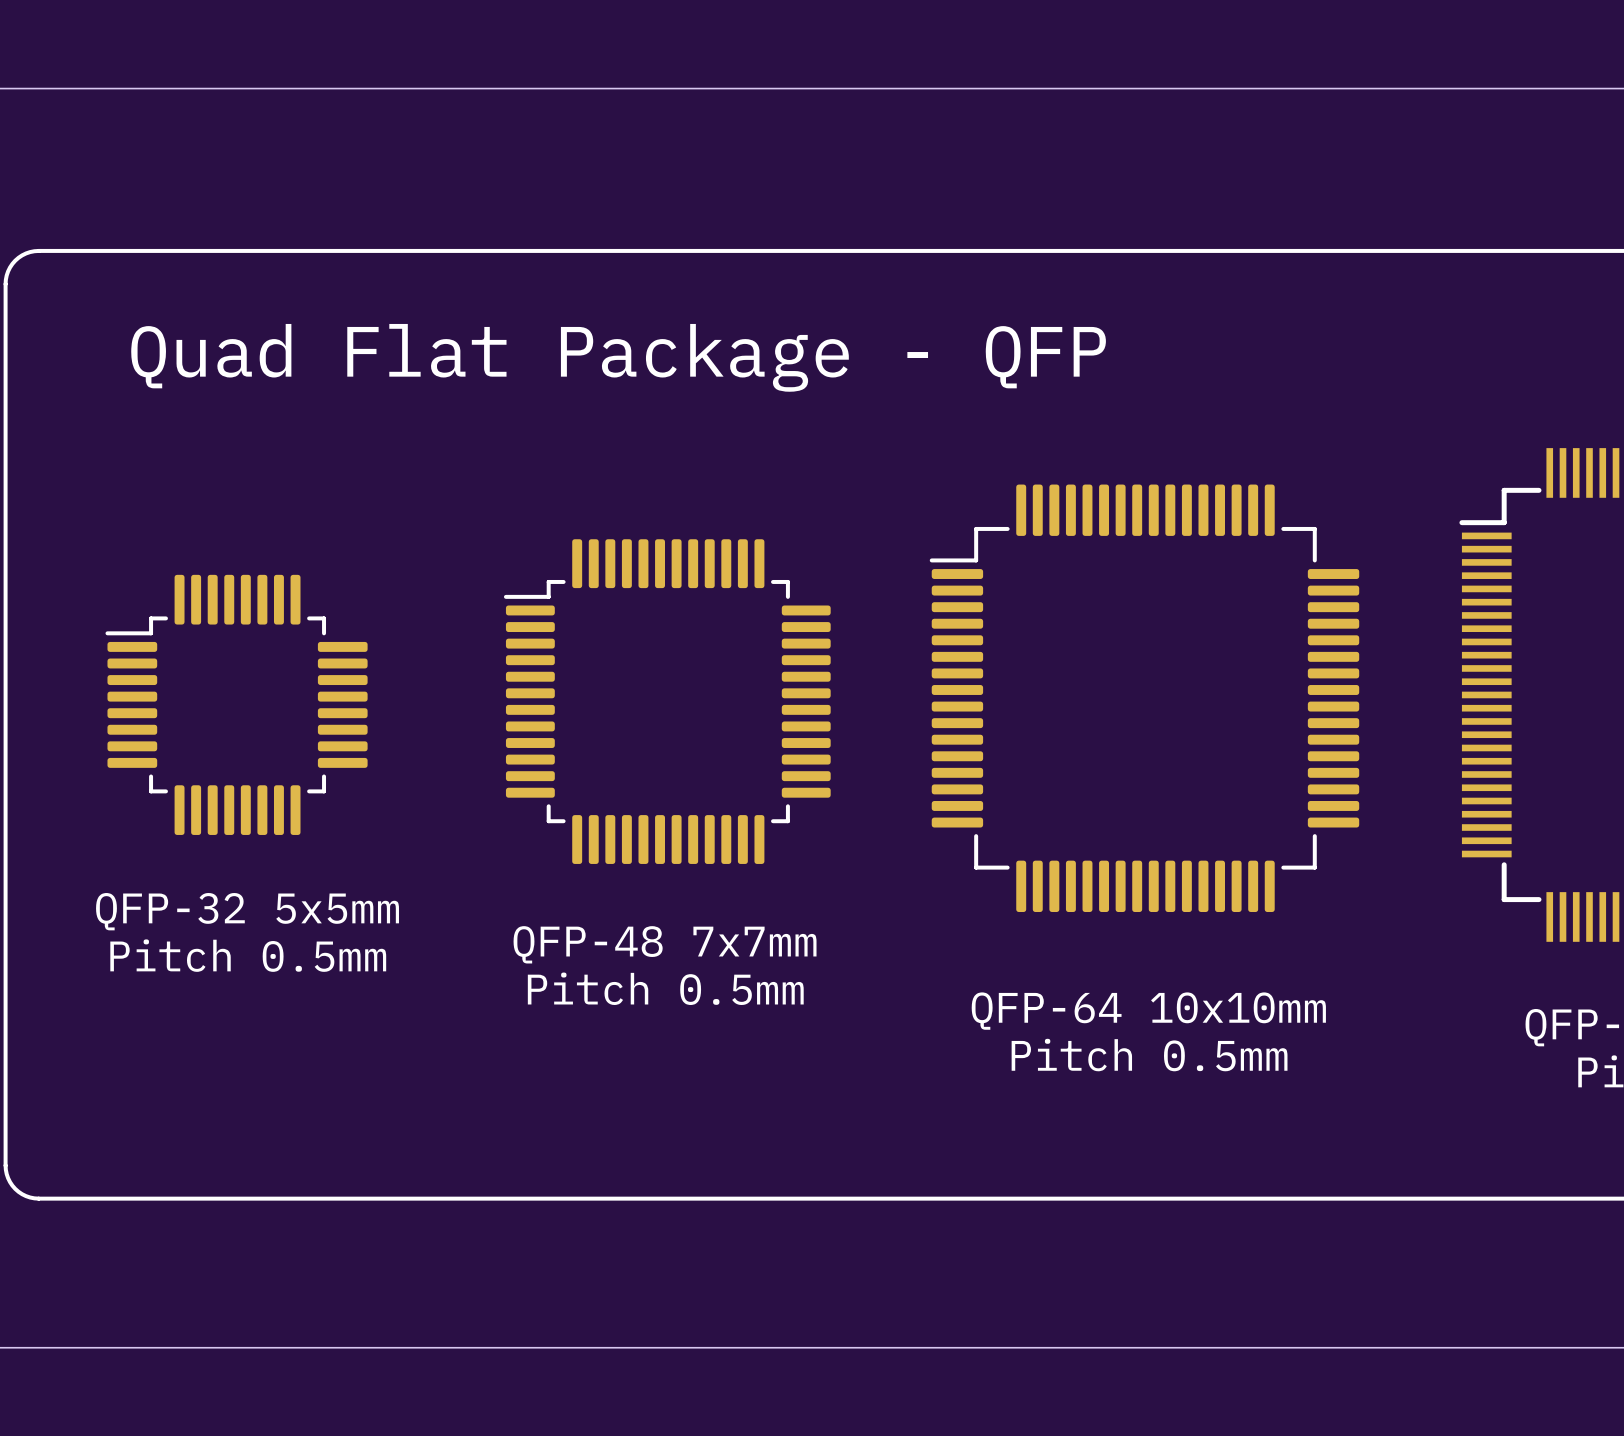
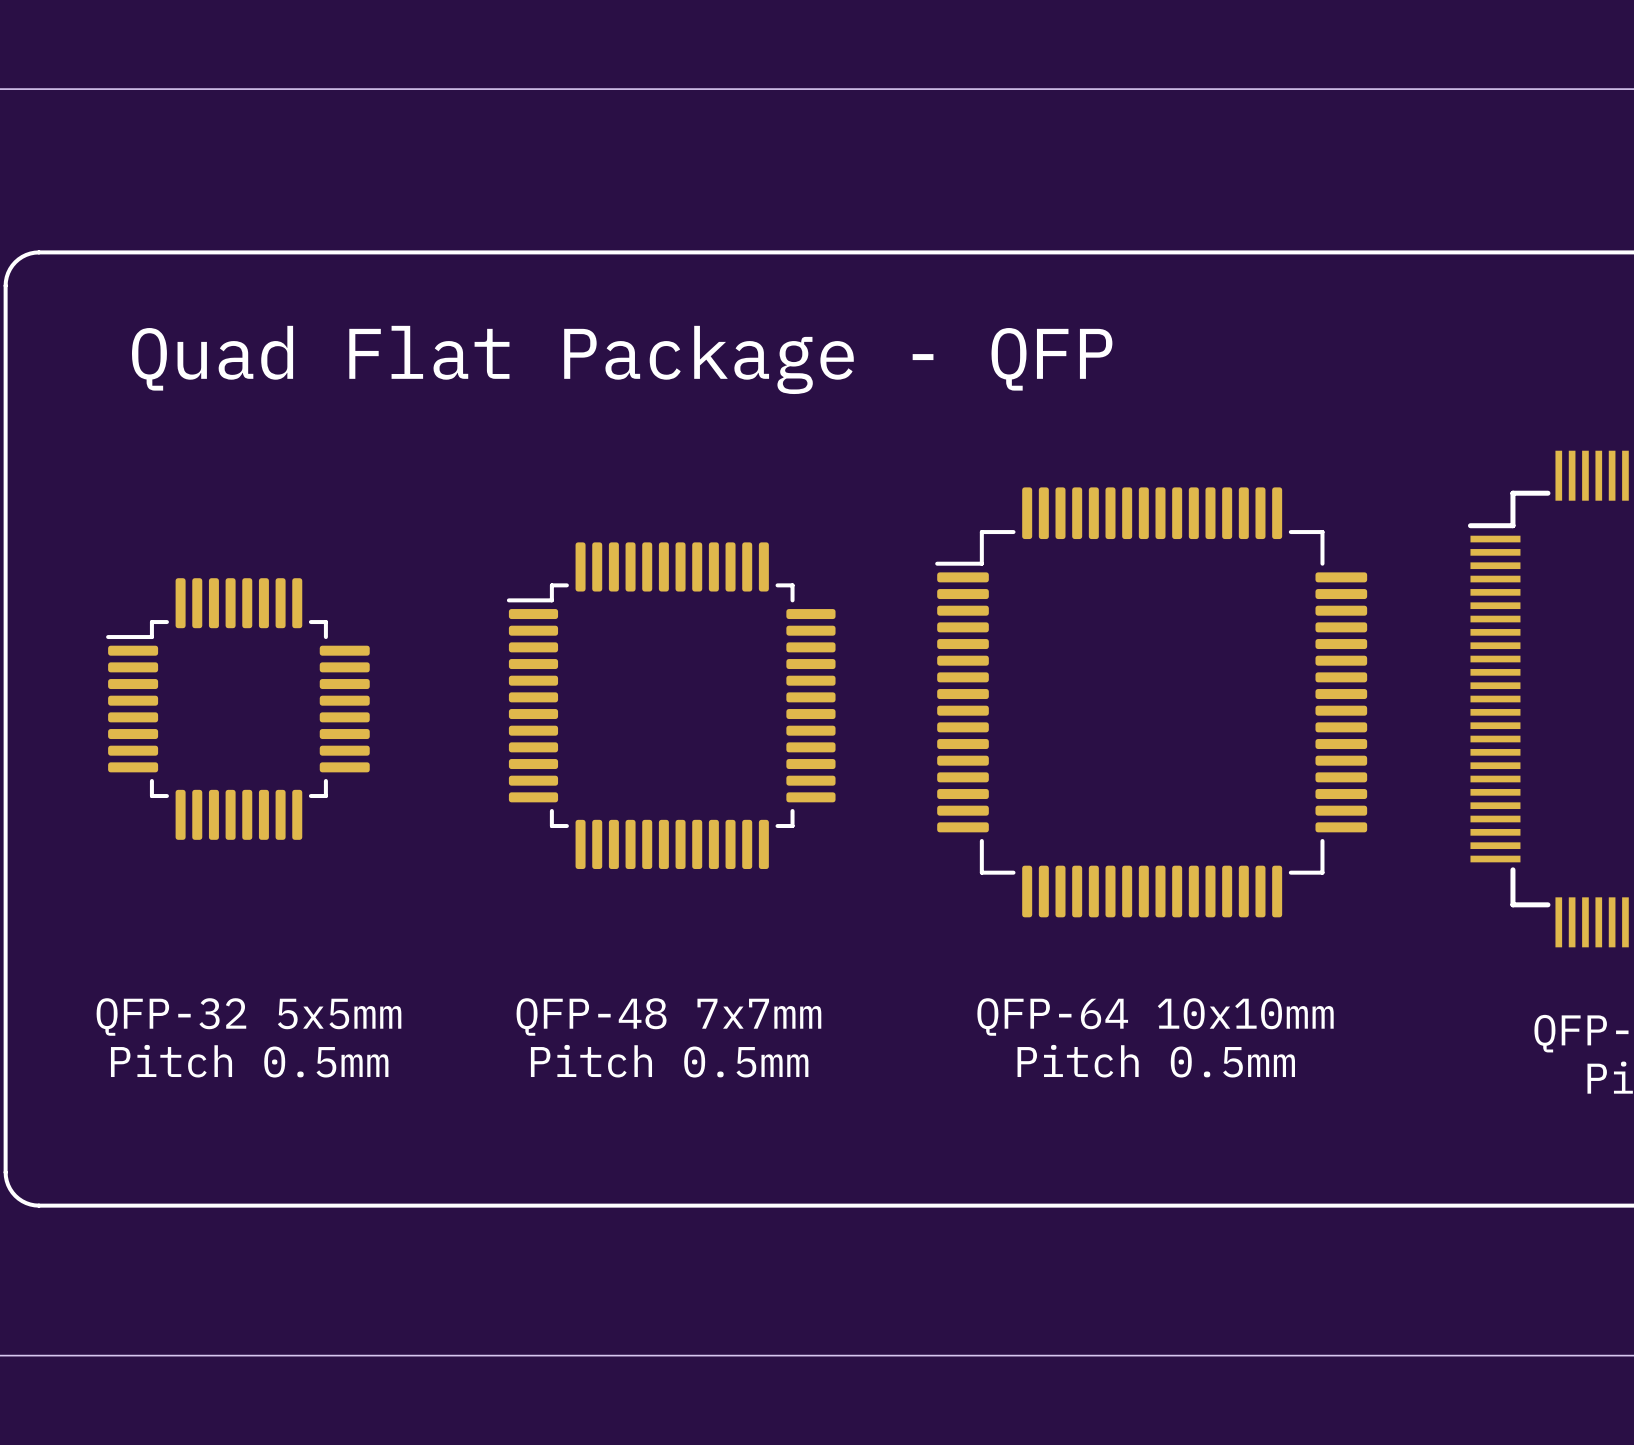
text position: QFP-32 5x5mm (247, 911) -> QFP-32 5x5mm (248, 1016)
text position: QFP-48 7x7mm (665, 944) -> QFP-48 7x7mm (668, 1016)
text position: Pitch 0.5mm (248, 955) -> Pitch 0.5mm (249, 1061)
text position: Pitch 0.5mm (665, 988) -> Pitch 0.5mm (669, 1061)

